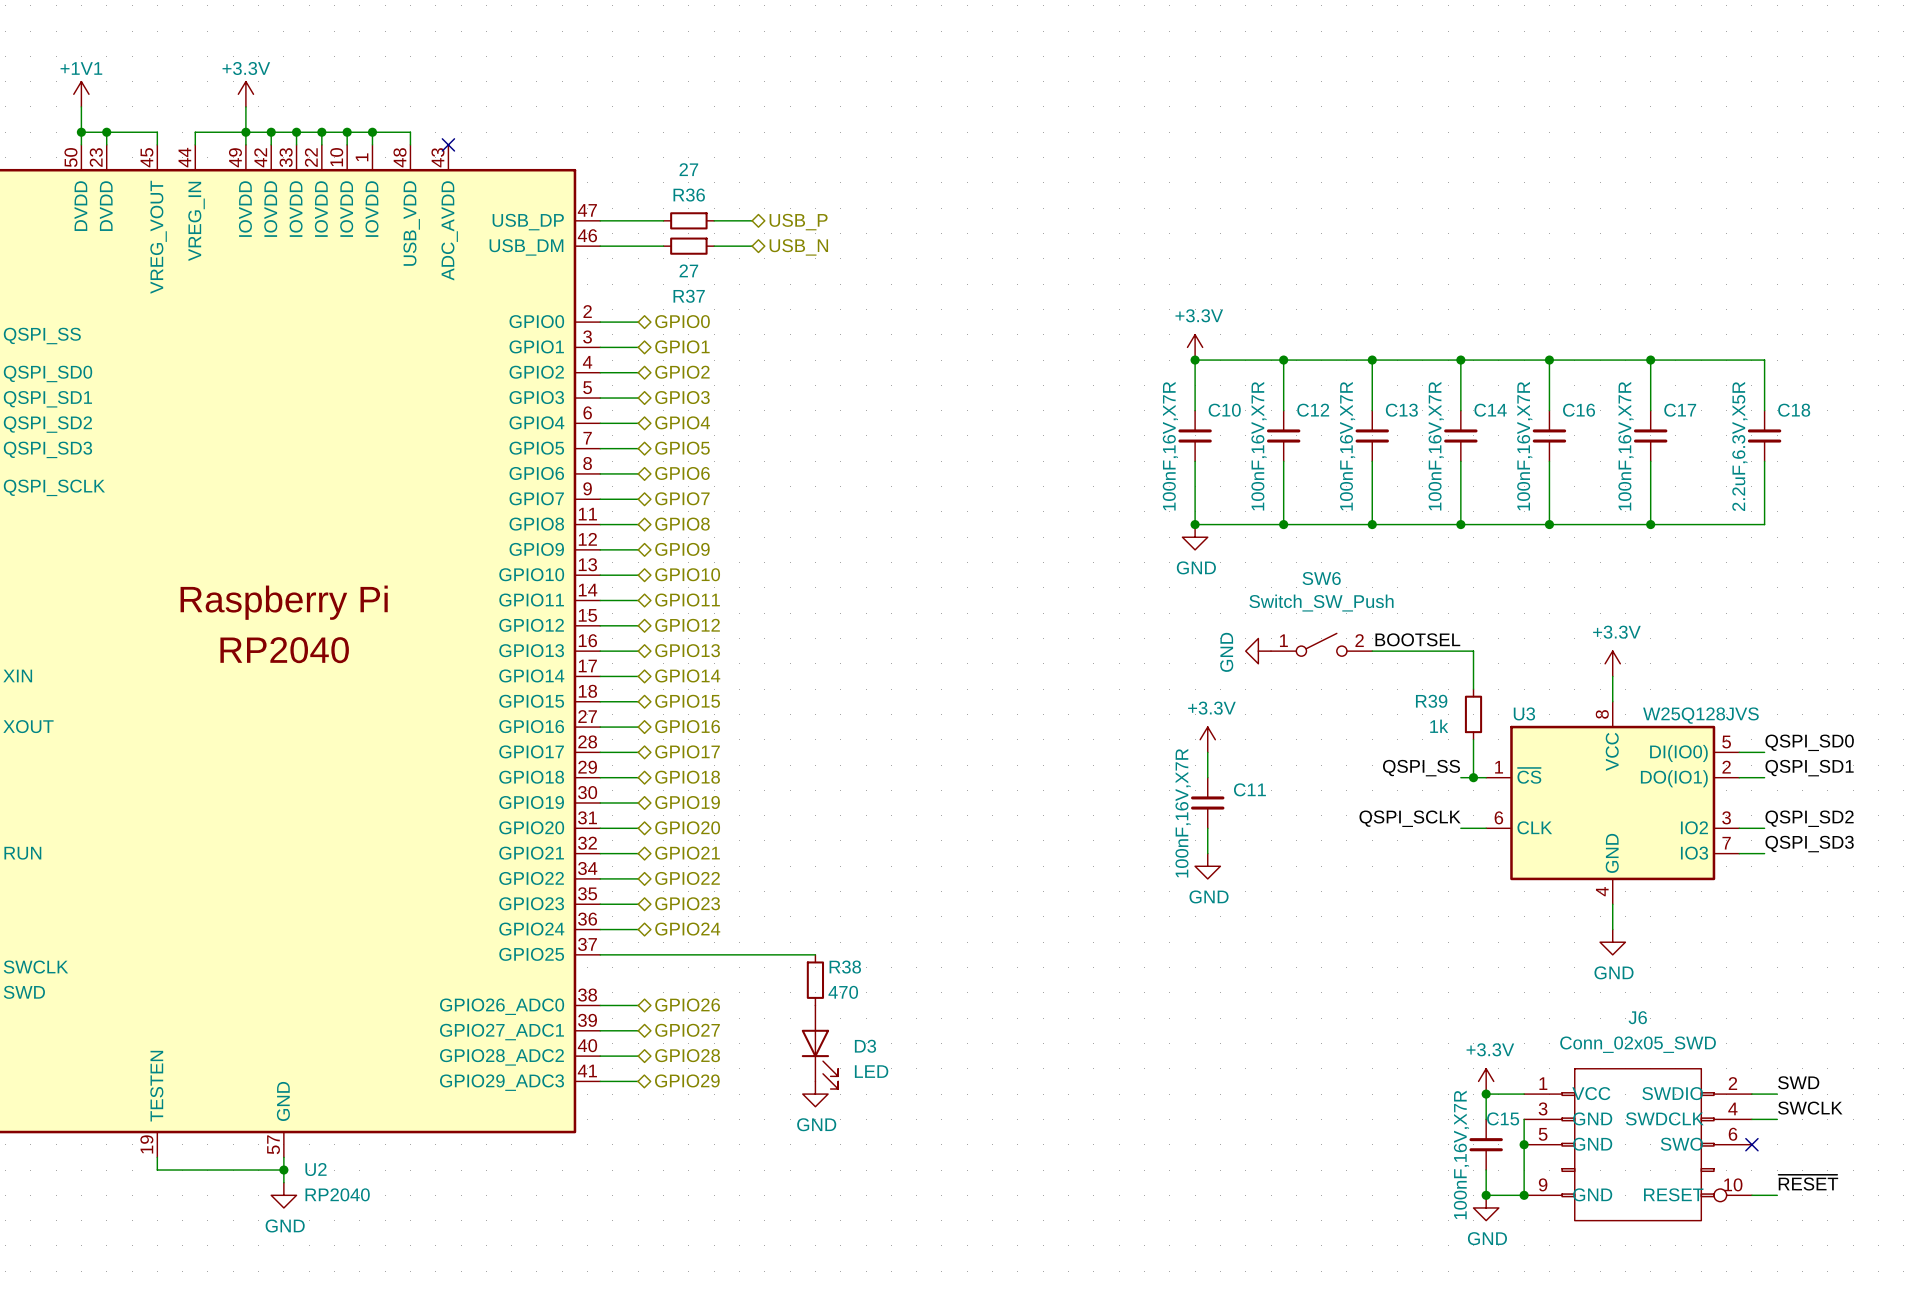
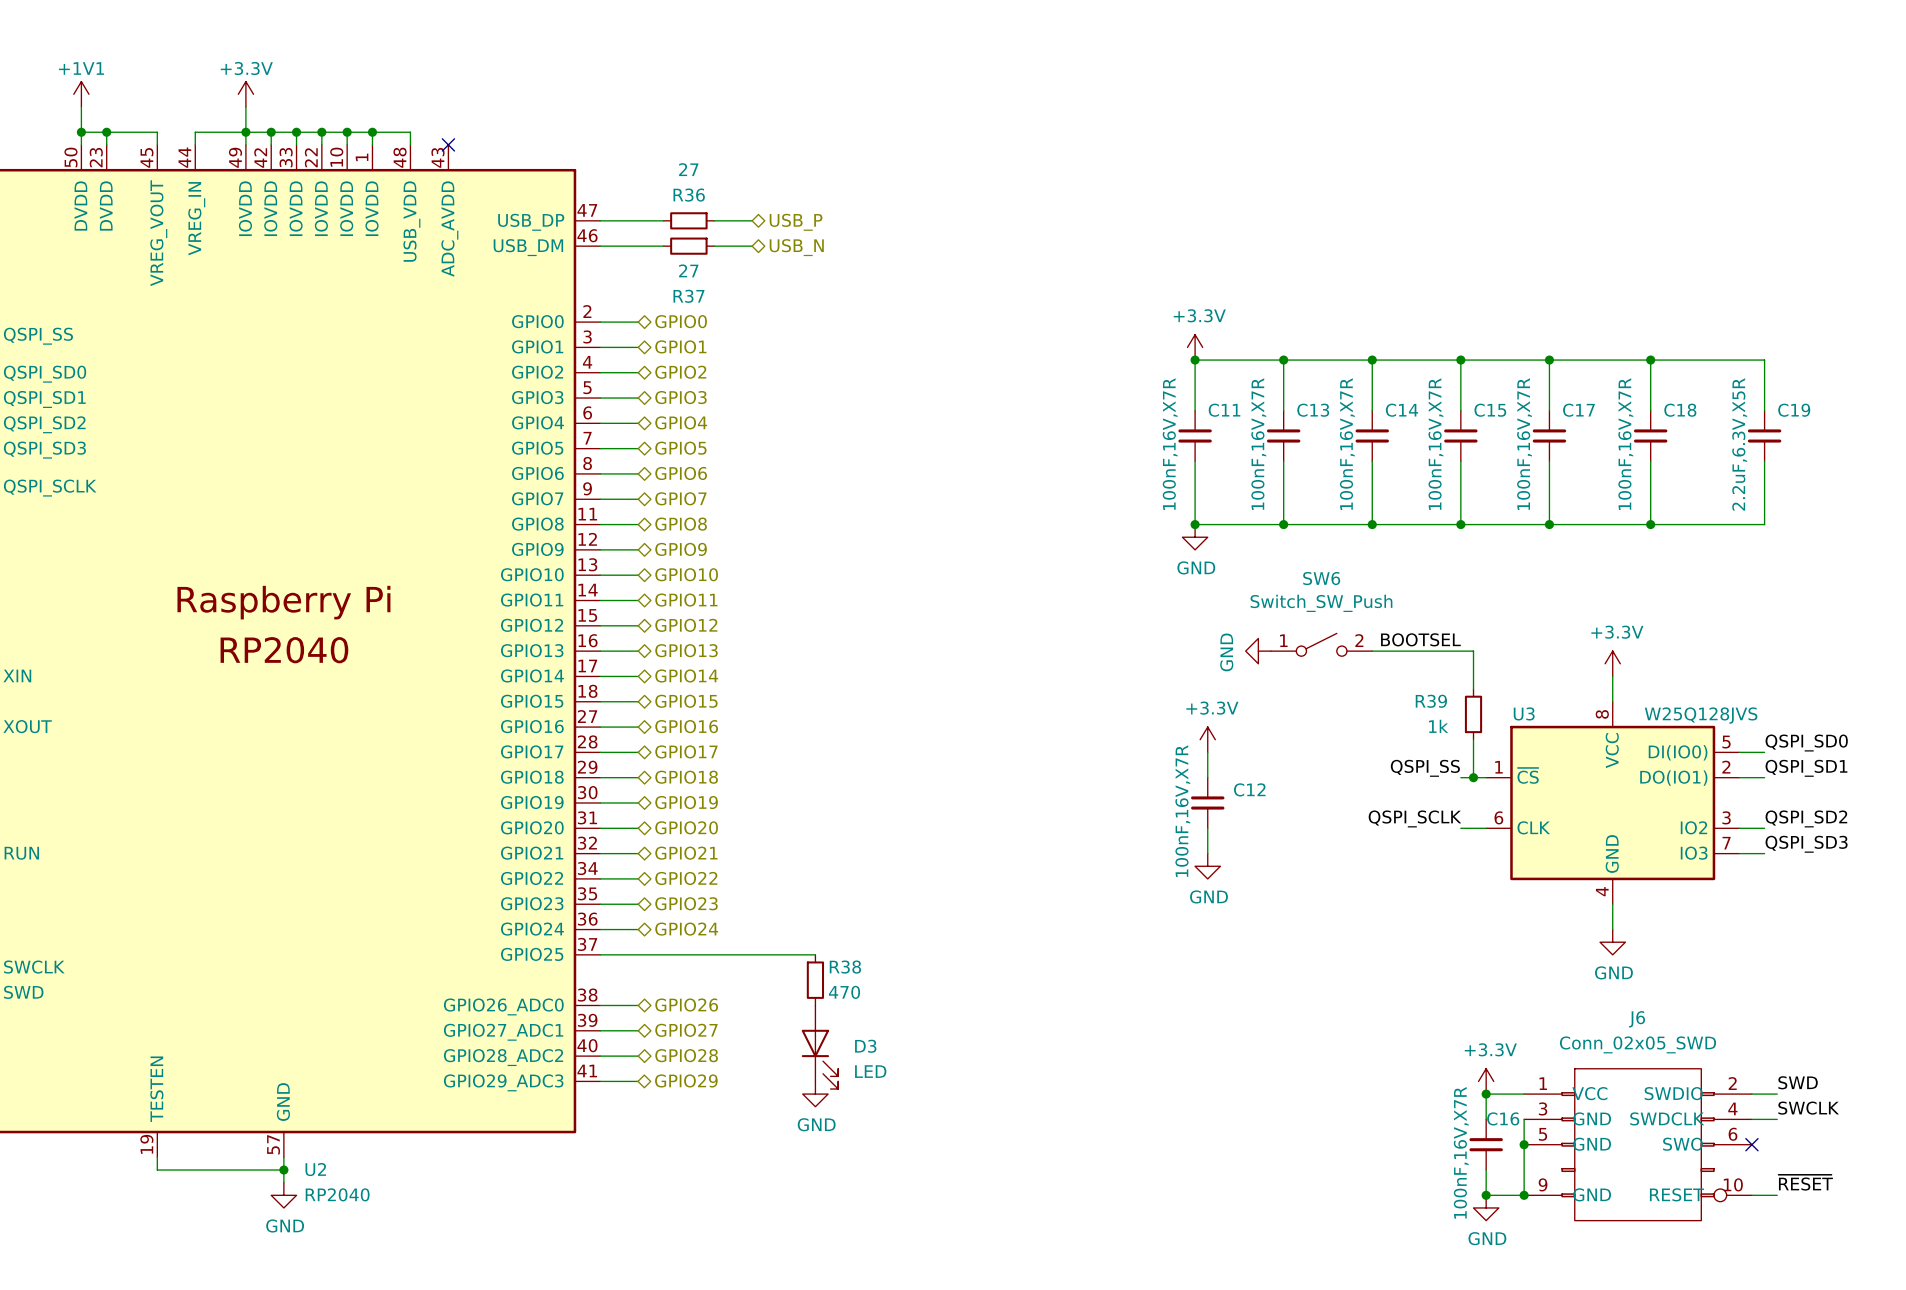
C10 name: C10 (1224, 410) -> C11 (1224, 410)
C12 name: C12 (1313, 410) -> C13 (1313, 410)
C13 name: C13 (1401, 410) -> C14 (1402, 410)
C14 name: C14 (1490, 410) -> C15 (1490, 410)
C16 name: C16 (1579, 410) -> C17 (1578, 410)
C17 name: C17 (1680, 410) -> C18 (1680, 410)
C18 name: C18 (1794, 410) -> C19 (1794, 410)
C11 name: C11 (1249, 789) -> C12 (1249, 789)
C15 name: C15 (1503, 1118) -> C16 (1503, 1118)

